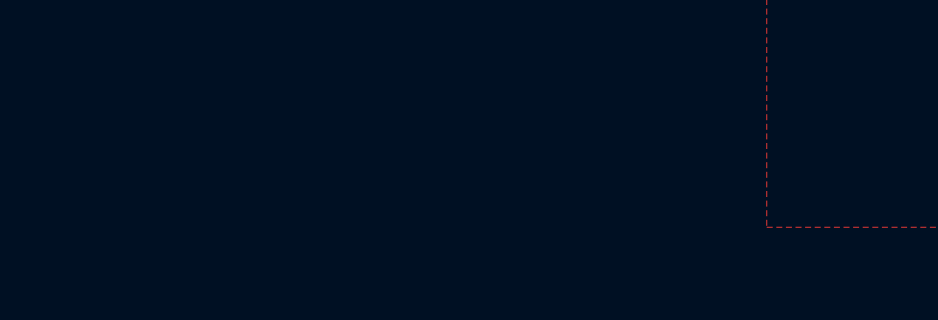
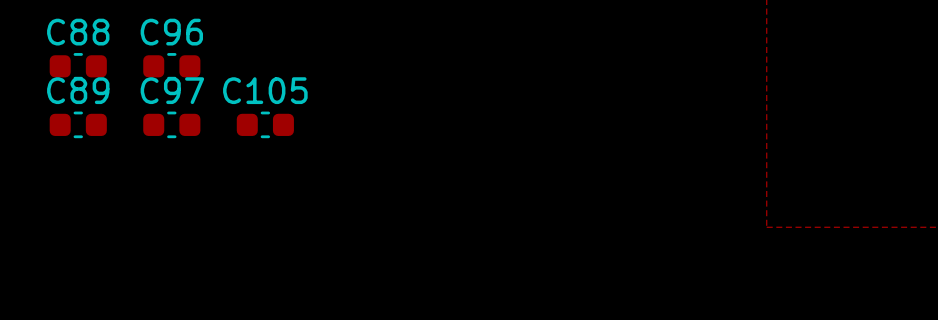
C88: none -> (78, 66)
C96: none -> (171, 66)
C89: none -> (78, 124)
C97: none -> (171, 124)
C105: none -> (265, 124)

